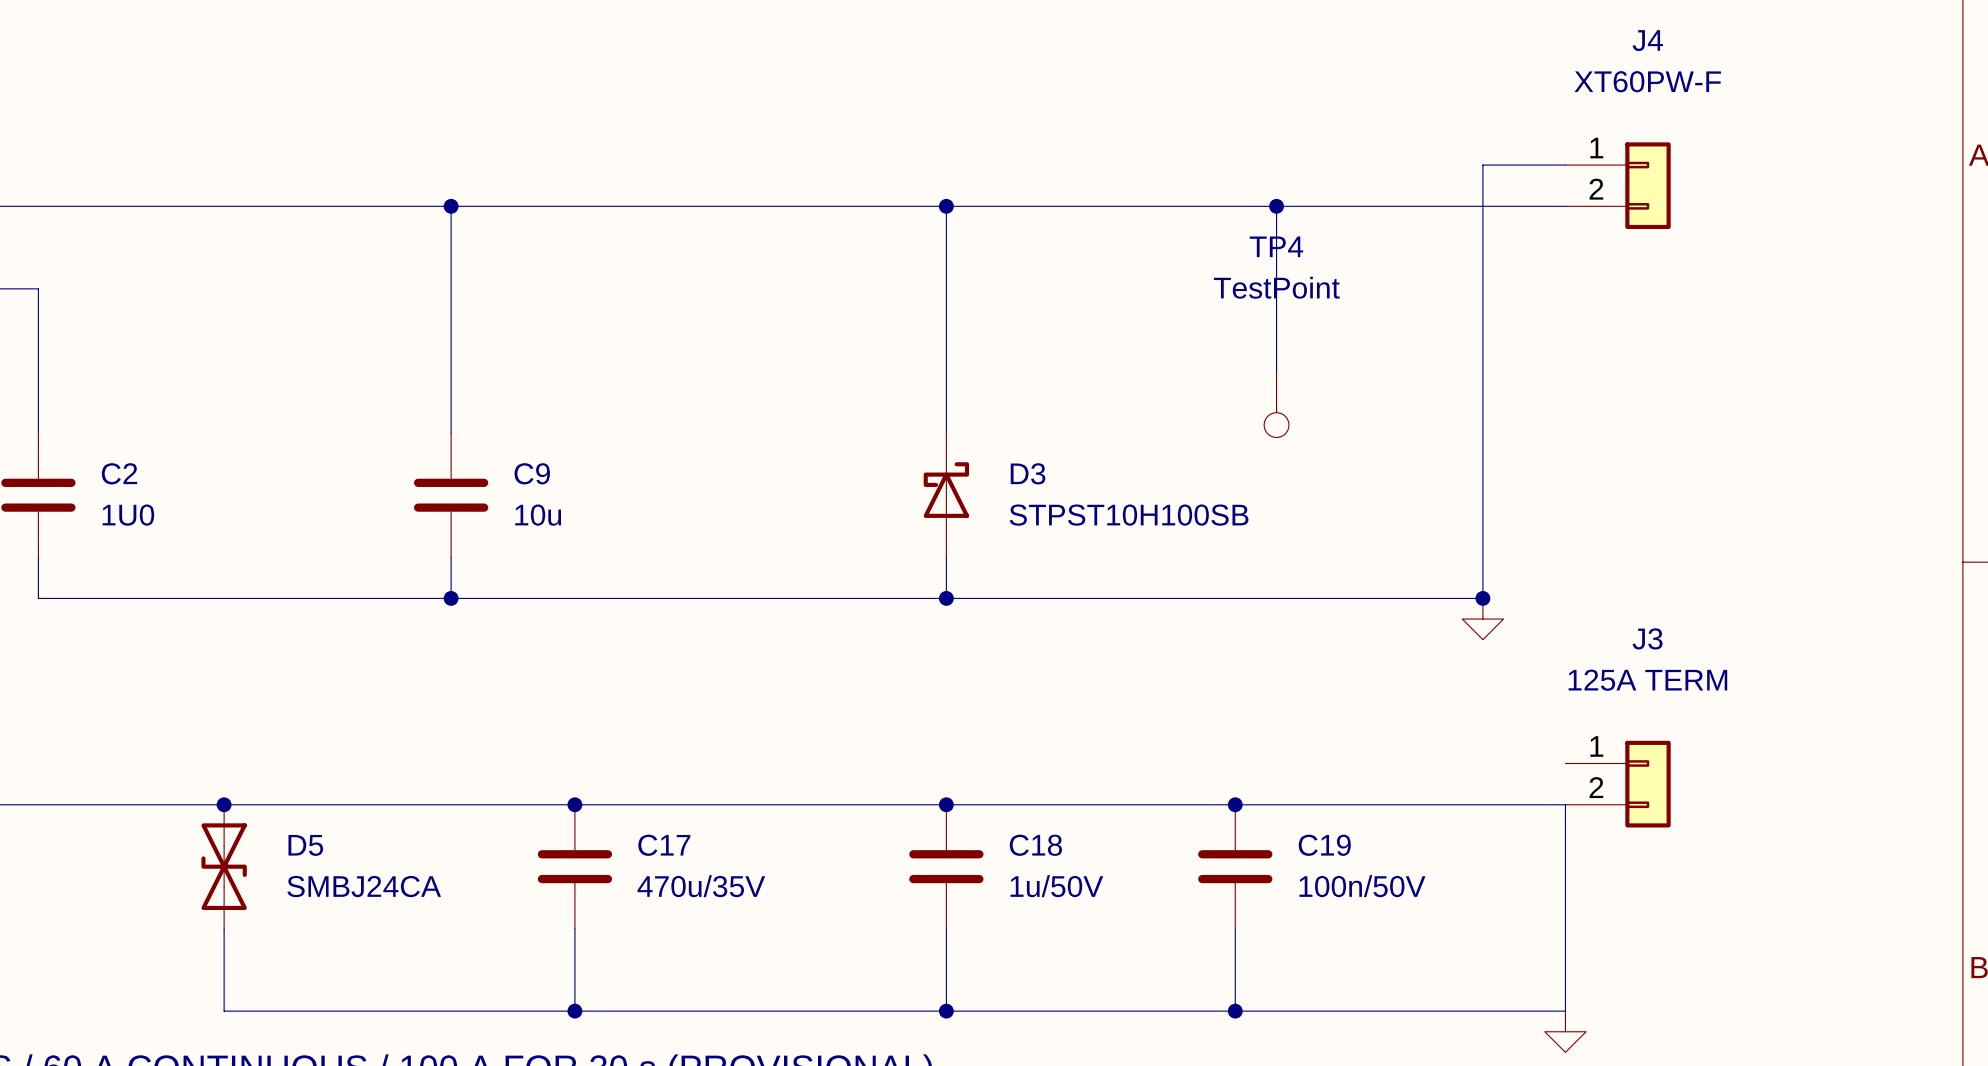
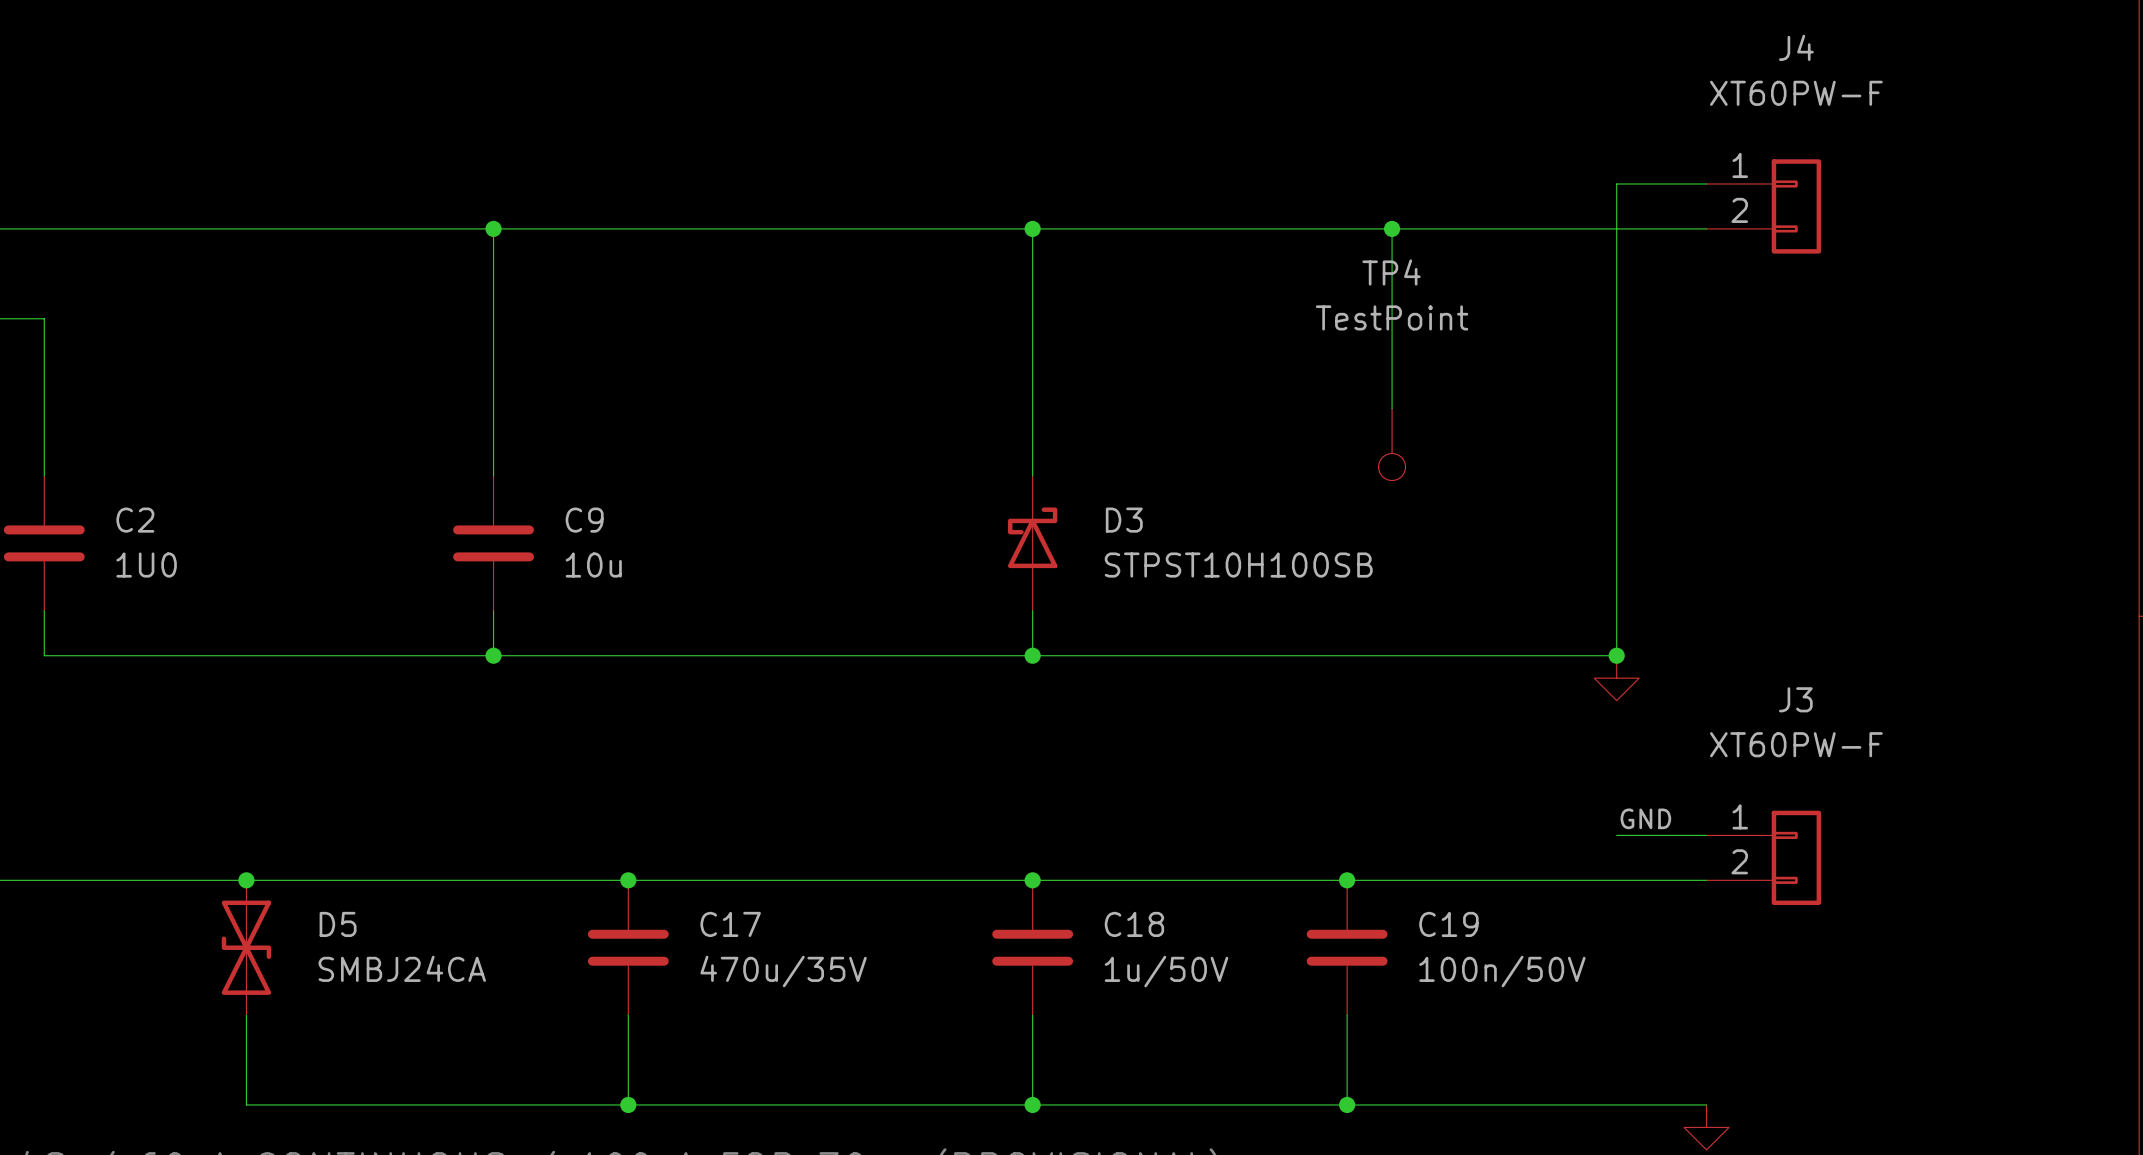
J3 value: 125A TERM (1647, 680) -> XT60PW-F (1796, 744)
label: none -> GND (1645, 818)
wire: none -> (1616, 835) (1706, 835)
wire: (1565, 804) (1565, 1011) -> none

